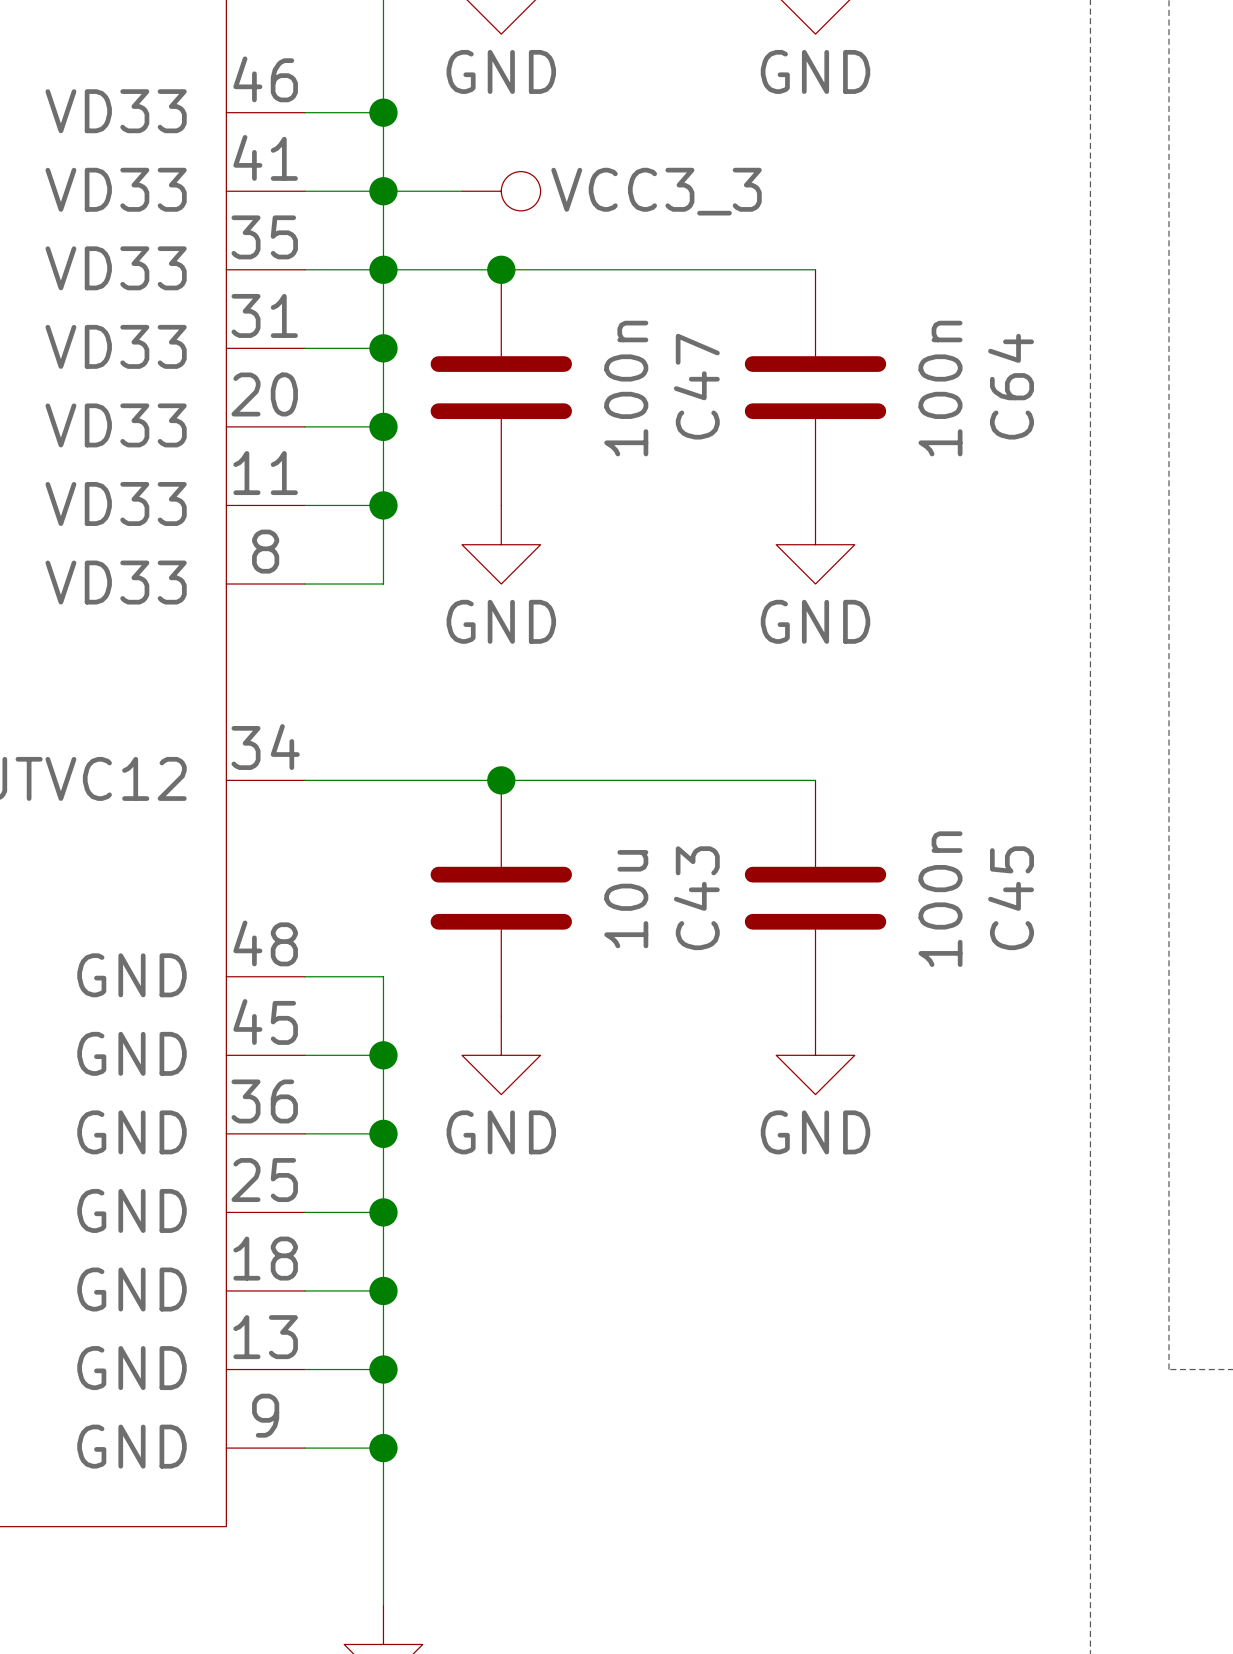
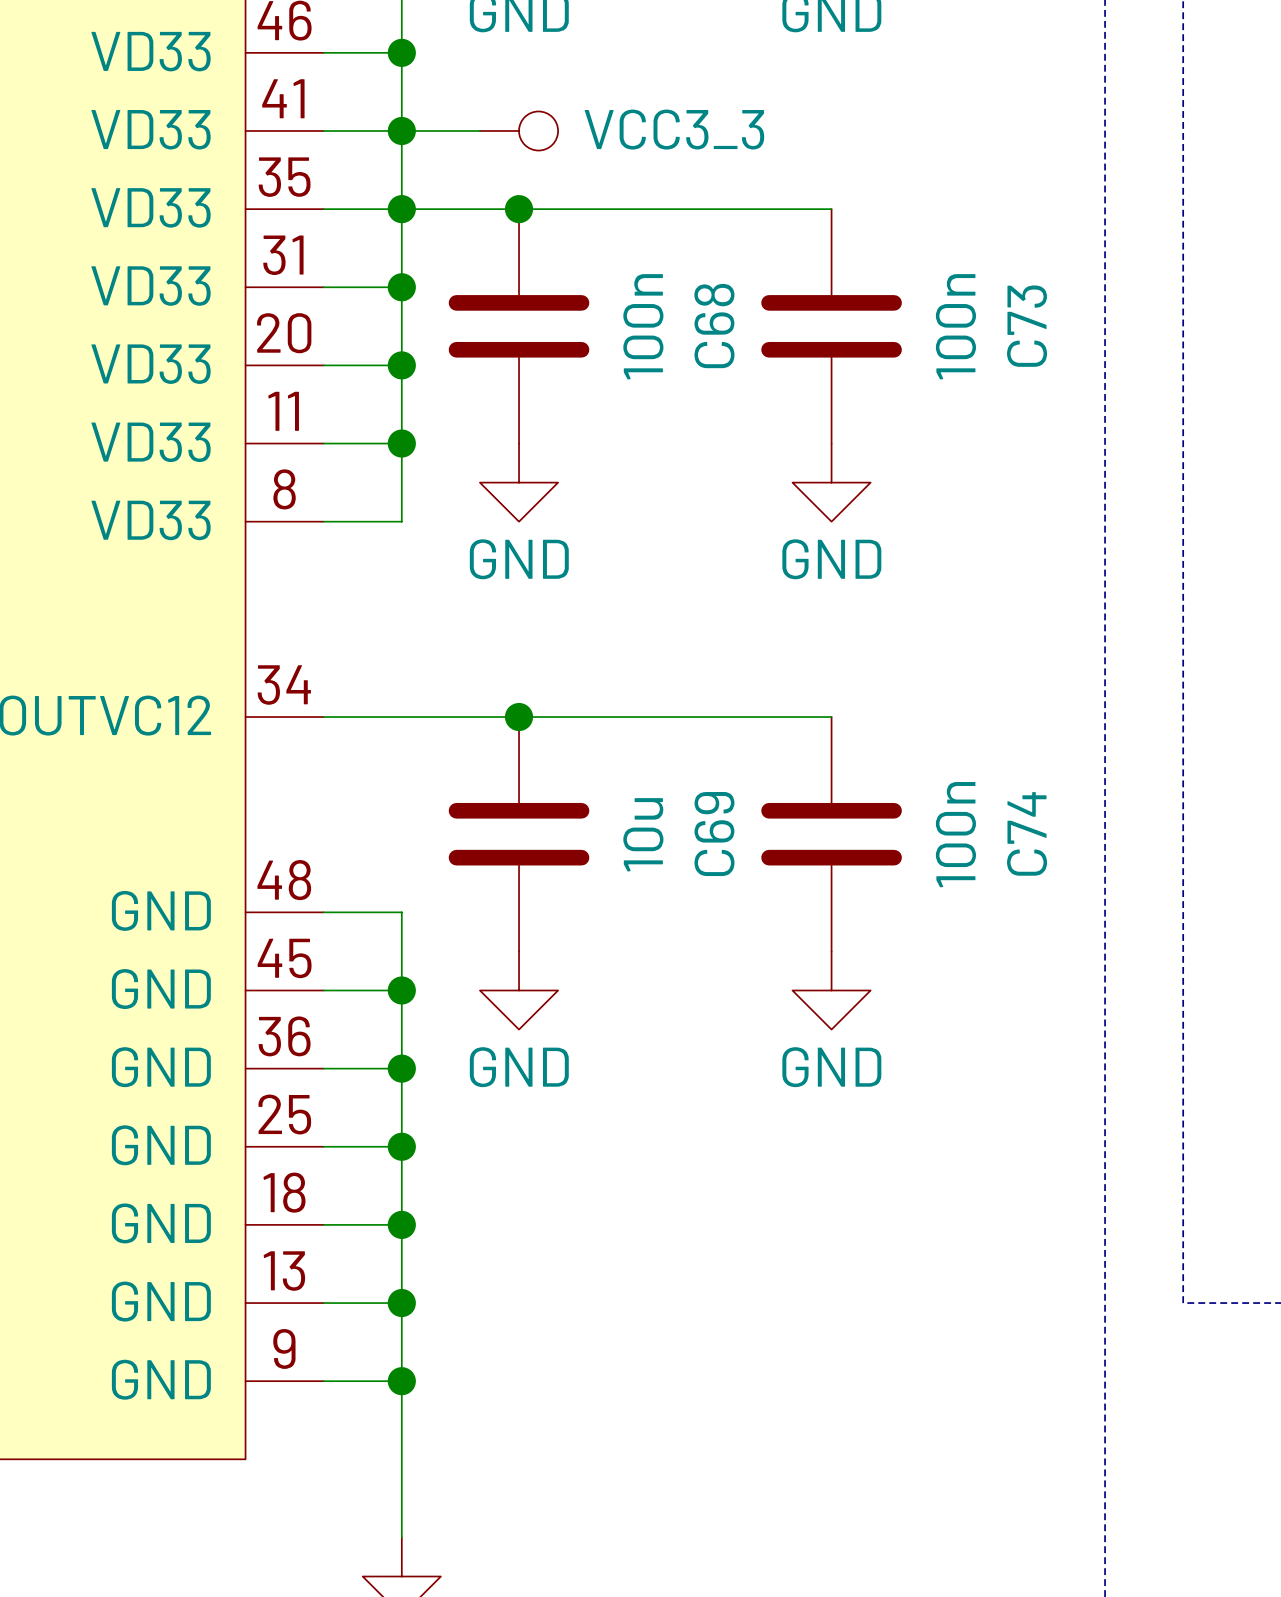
C47 name: C47 (696, 386) -> C68 (714, 326)
C64 name: C64 (1011, 386) -> C73 (1027, 326)
C43 name: C43 (696, 898) -> C69 (714, 834)
C45 name: C45 (1011, 898) -> C74 (1027, 833)

